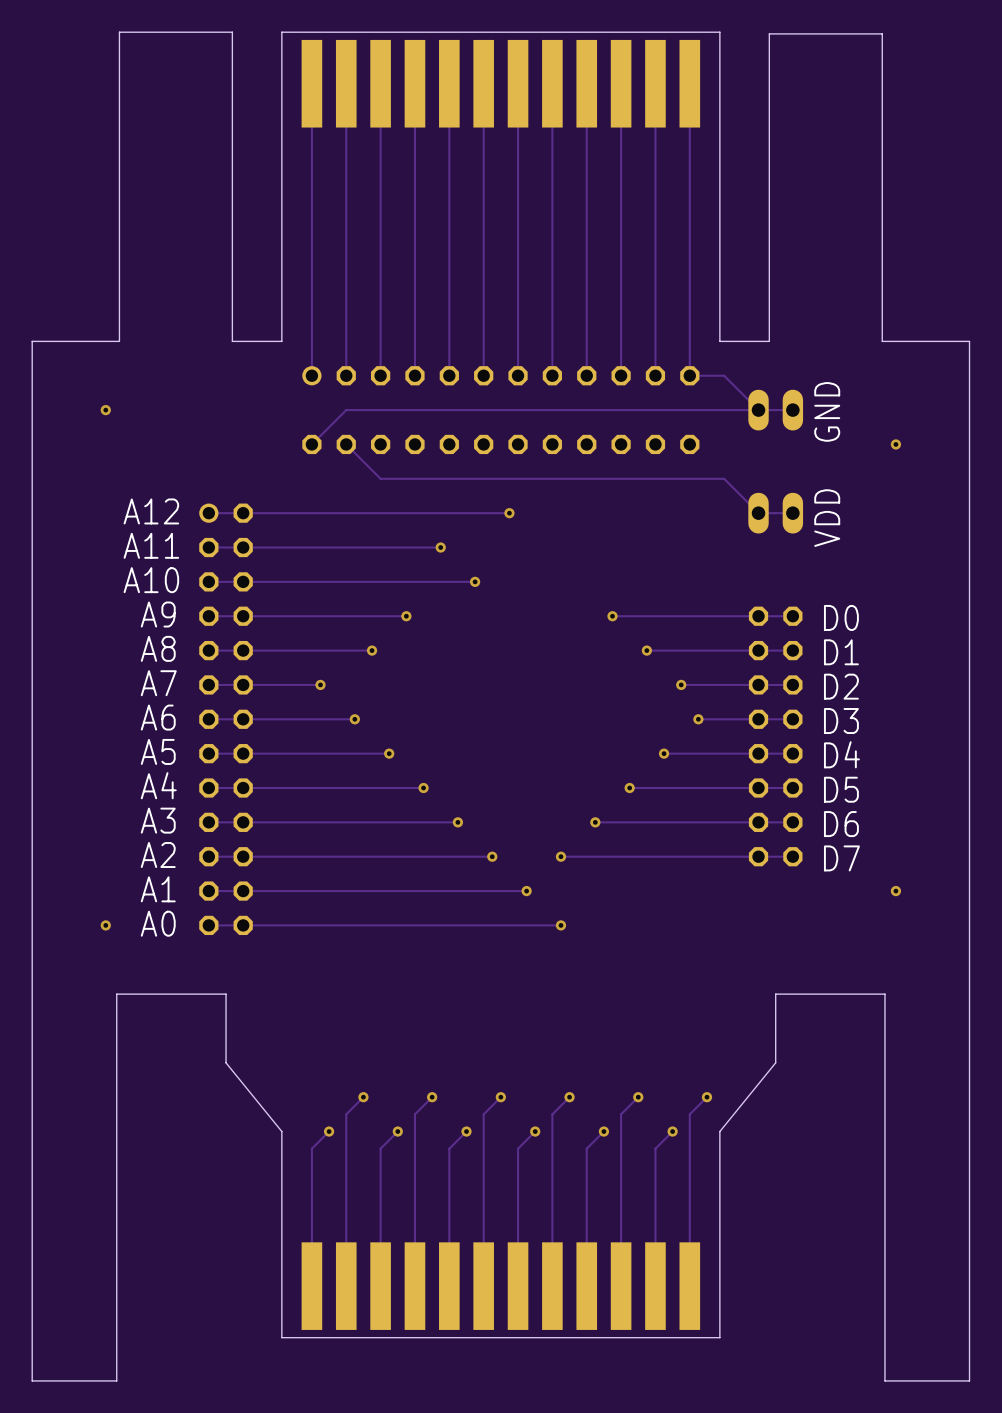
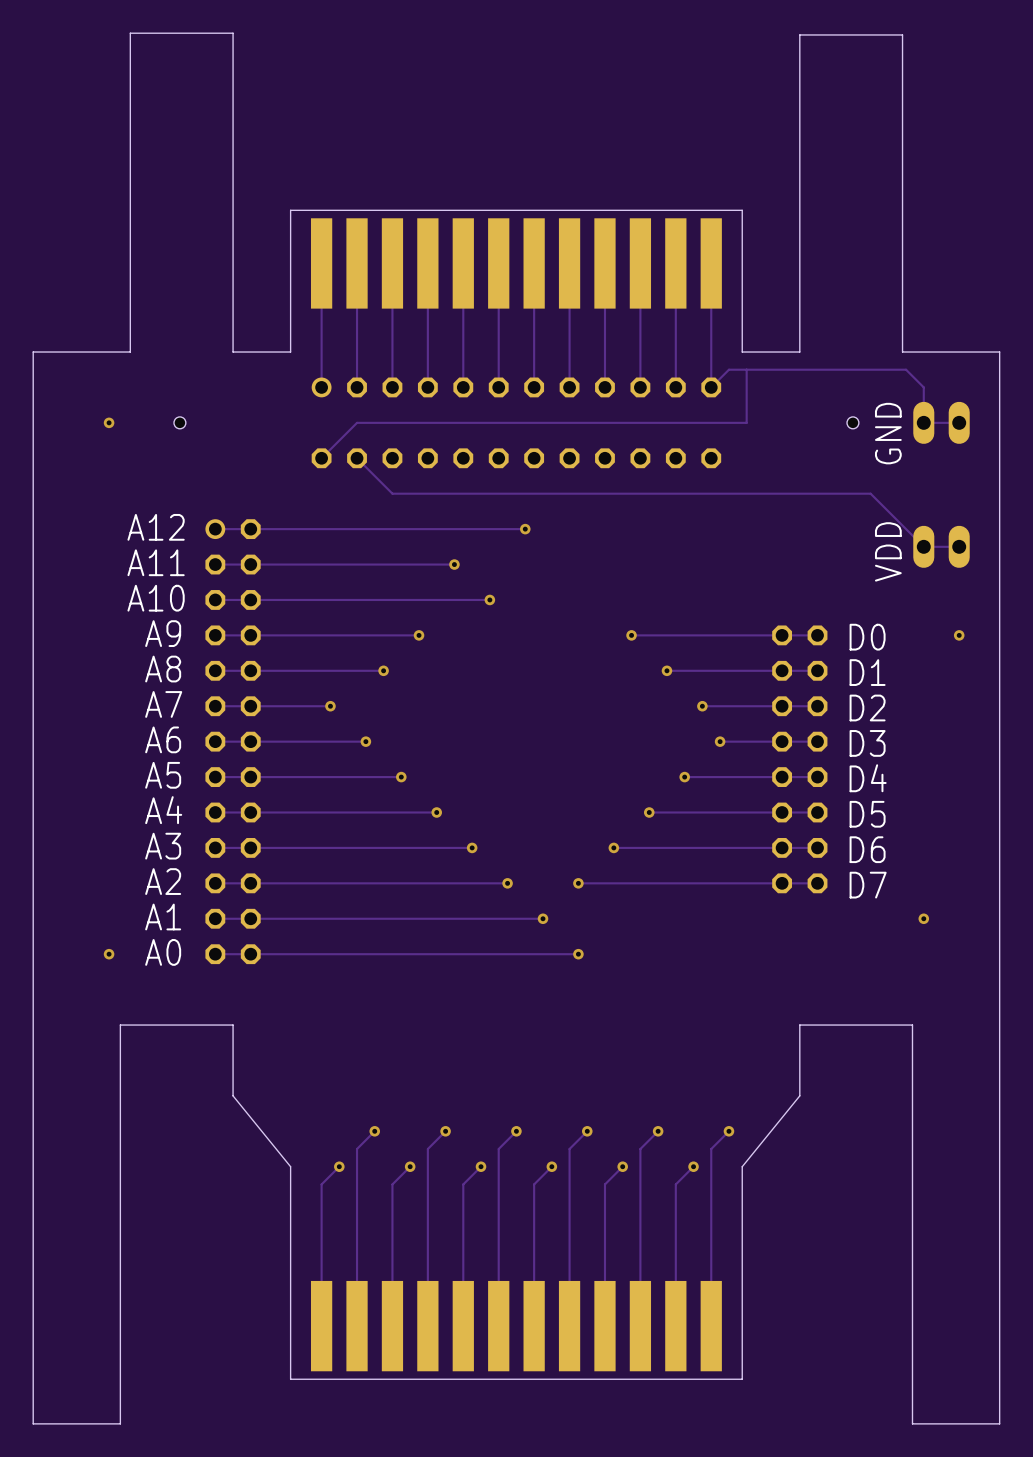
part footprint: [32, 32, 970, 1381] -> [33, 33, 1000, 1424]
track: (311, 83) (311, 255) -> none
track: (346, 83) (346, 255) -> none
track: (380, 83) (380, 255) -> none
track: (414, 83) (414, 255) -> none
track: (449, 83) (449, 255) -> none
track: (483, 83) (483, 255) -> none
track: (518, 83) (518, 255) -> none
track: (552, 83) (552, 255) -> none
track: (586, 83) (586, 255) -> none
track: (621, 83) (621, 255) -> none
track: (655, 83) (655, 255) -> none
track: (689, 83) (689, 255) -> none
track: (689, 375) (724, 375) (758, 410) -> (711, 387) (728, 369) (906, 369) (923, 387) (923, 422) (959, 422)
hole: none -> (179, 422)
part: (775, 410) -> none
track: (792, 410) (724, 410) -> (746, 369) (746, 422)
hole: none -> (852, 422)
part: none -> (941, 422)
text position: GND (827, 411) -> GND (888, 433)
via: (895, 444) -> none
track: (724, 478) (758, 513) (792, 513) -> (746, 493) (870, 493) (923, 546) (959, 546)
part: (775, 513) -> none
text position: VDD (827, 518) -> VDD (888, 551)
part: none -> (941, 546)
via: none -> (959, 635)

